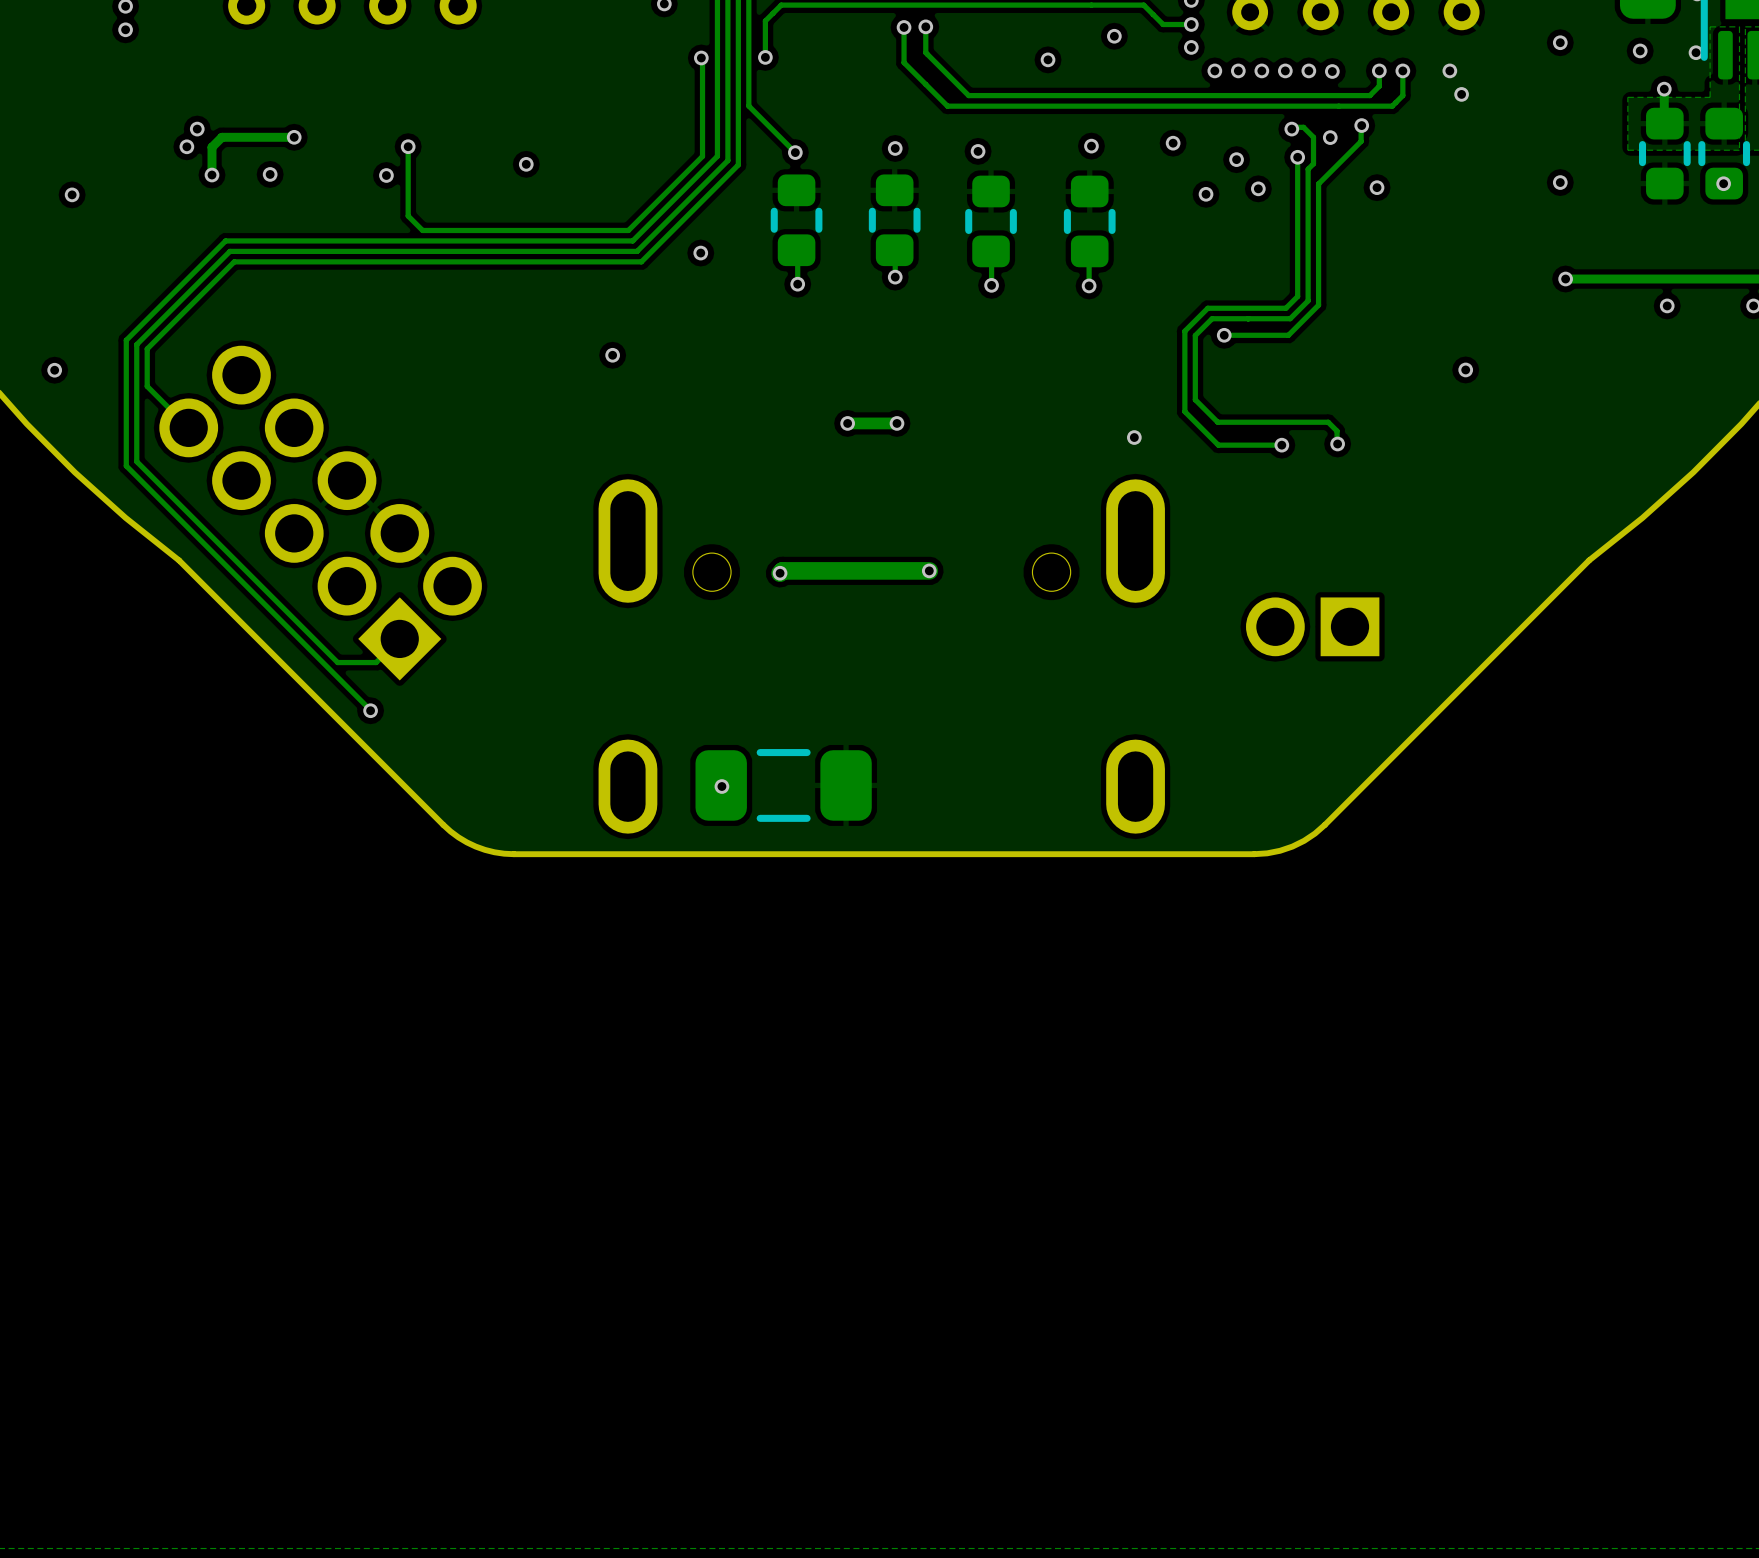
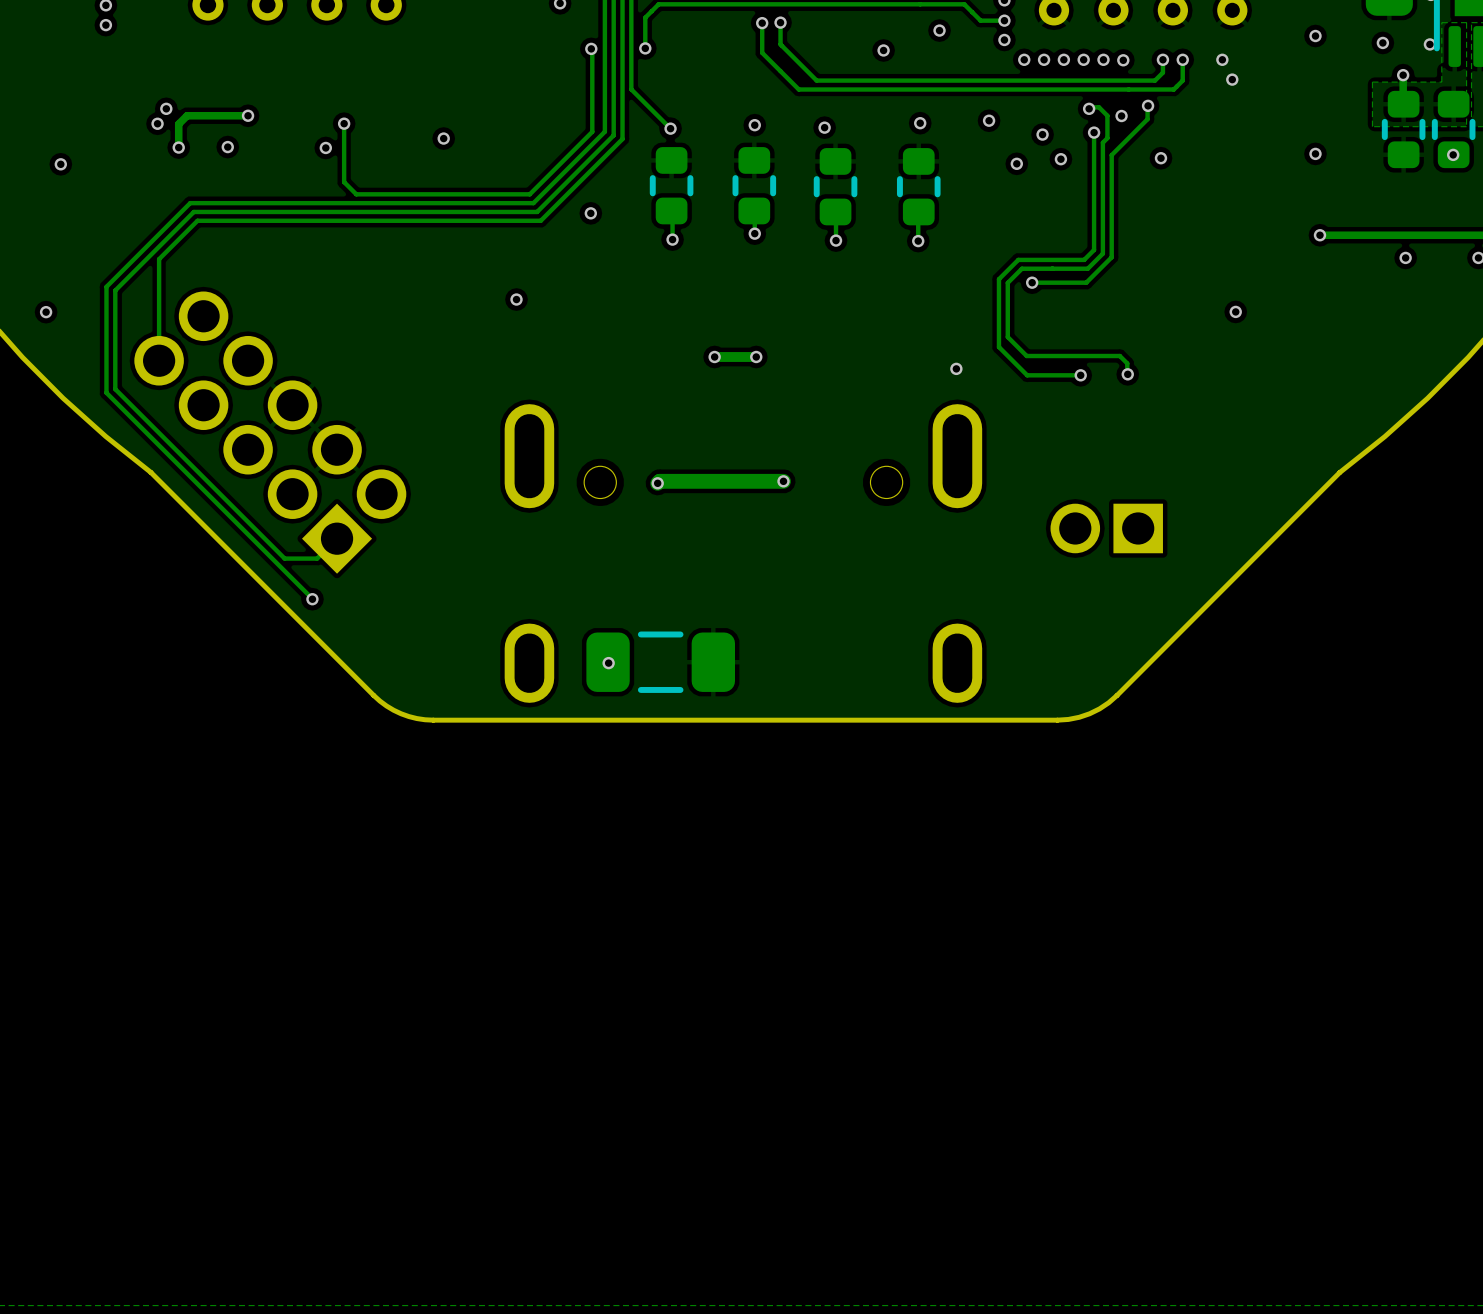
track: (188, 307) (147, 348) (147, 386) (188, 427) -> (159, 259) (159, 360)

